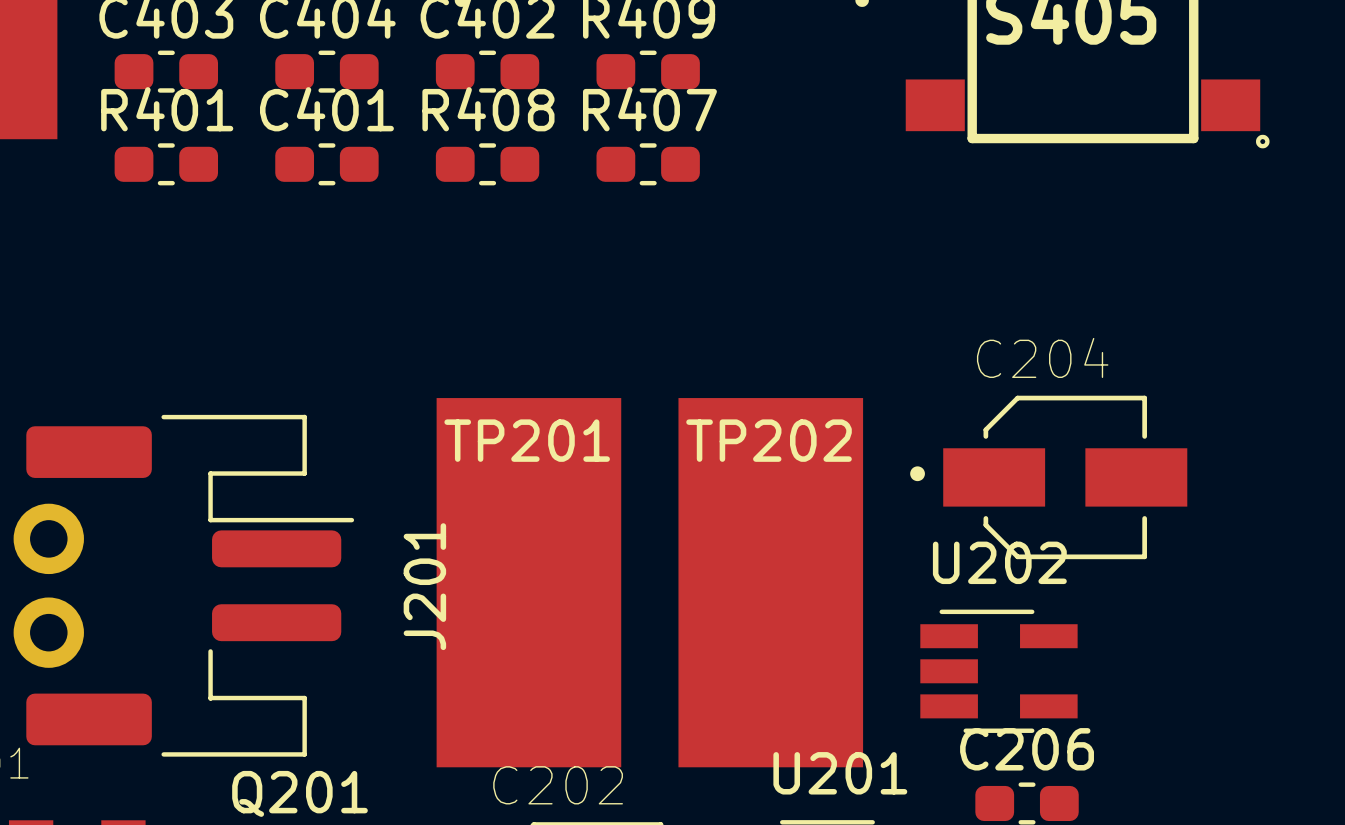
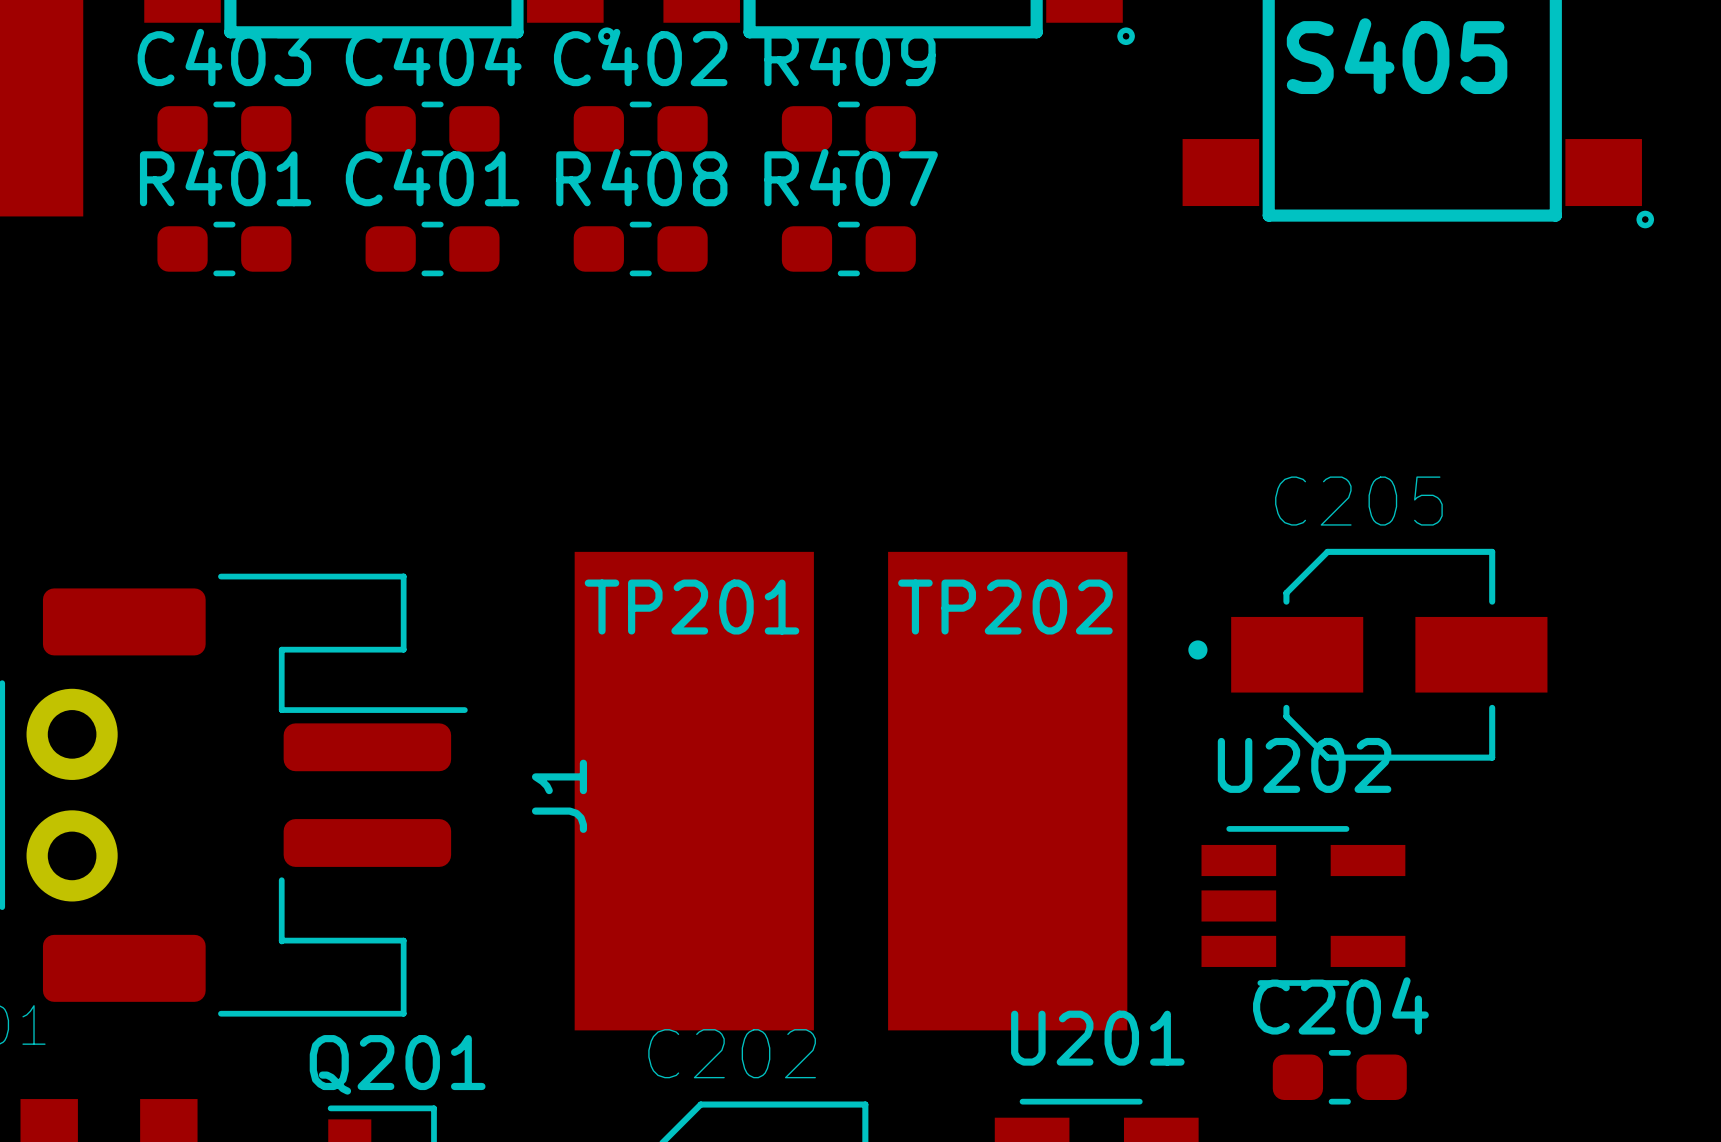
C204 name: C204 (1042, 357) -> C205 (1358, 501)
J201 name: J201 (424, 586) -> J1 (559, 796)
C206 name: C206 (1027, 749) -> C204 (1340, 1005)

